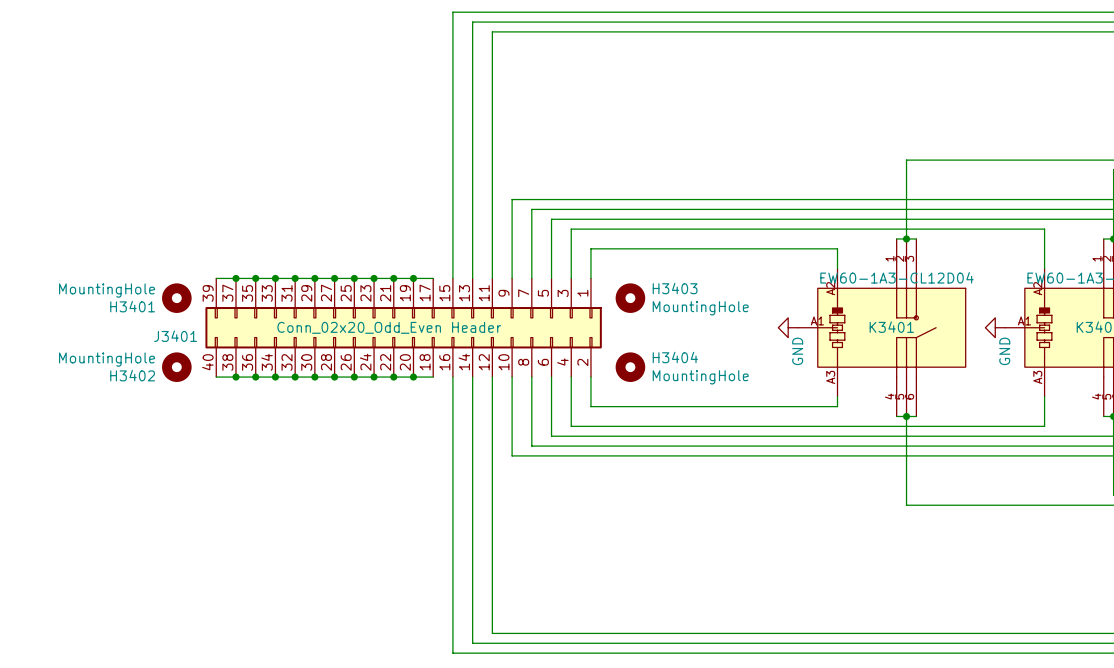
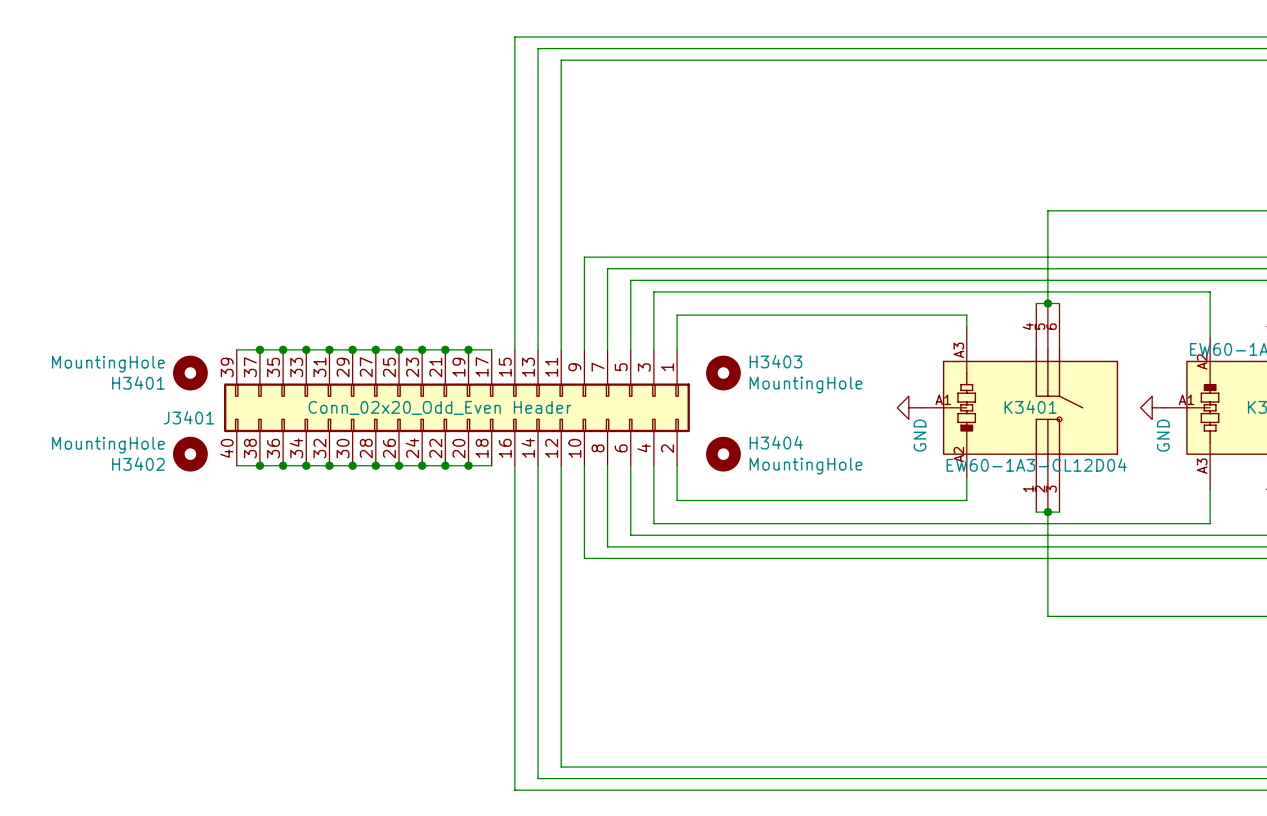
K3401 flip: as is (891, 327) -> up-down (1030, 407)

